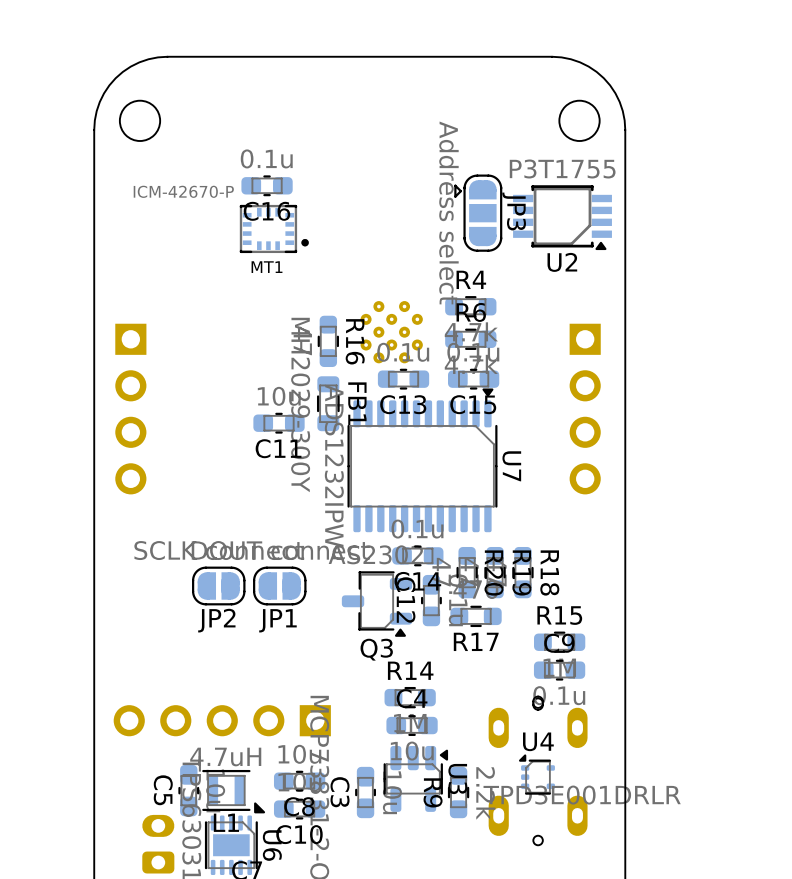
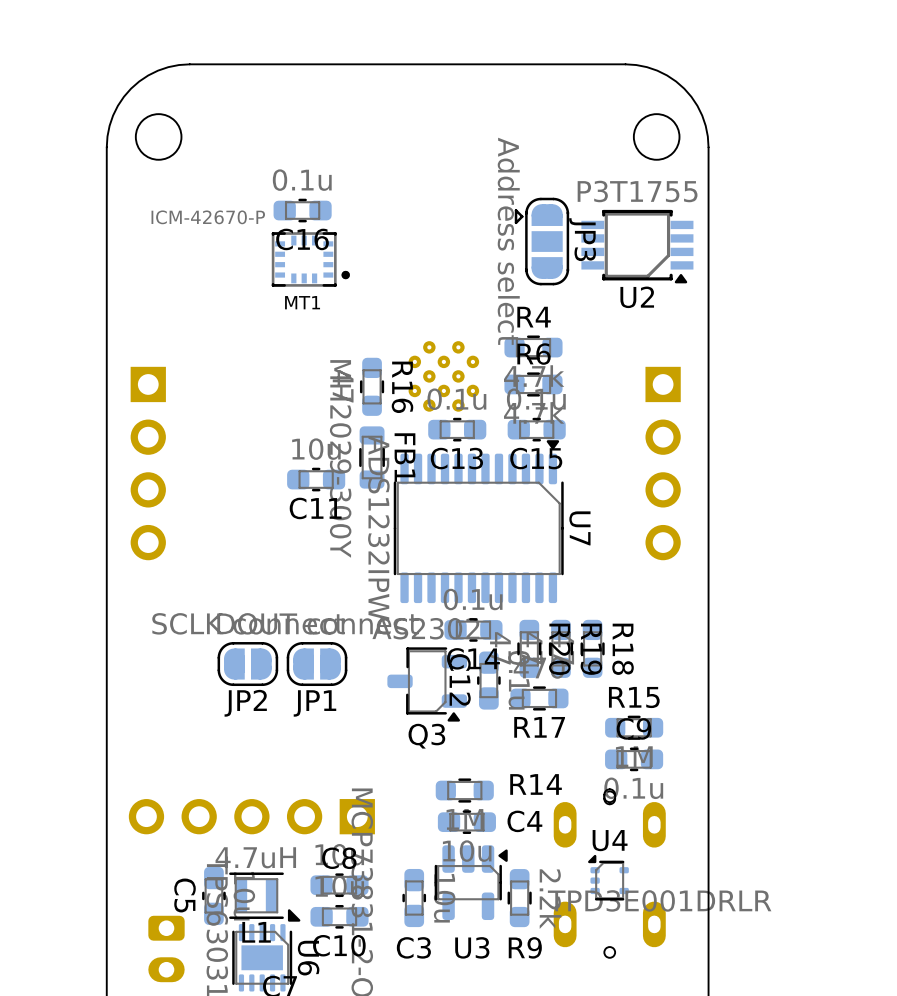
R14 name position: R14 (410, 670) -> R14 (536, 784)
C4 name position: C4 (412, 698) -> C4 (524, 821)
U3 name rotation: 0° (457, 779) -> 90° counterclockwise (472, 947)
U3 name position: U3 (457, 779) -> U3 (472, 947)
C3 name rotation: 0° (340, 792) -> 90° counterclockwise (413, 947)
C3 name position: C3 (340, 792) -> C3 (413, 947)
R9 name rotation: 0° (433, 792) -> 90° counterclockwise (525, 947)
R9 name position: R9 (433, 792) -> R9 (525, 947)
C8 name position: C8 (299, 806) -> C8 (339, 858)
part rotation: 0° (158, 844) -> 180° (166, 948)

